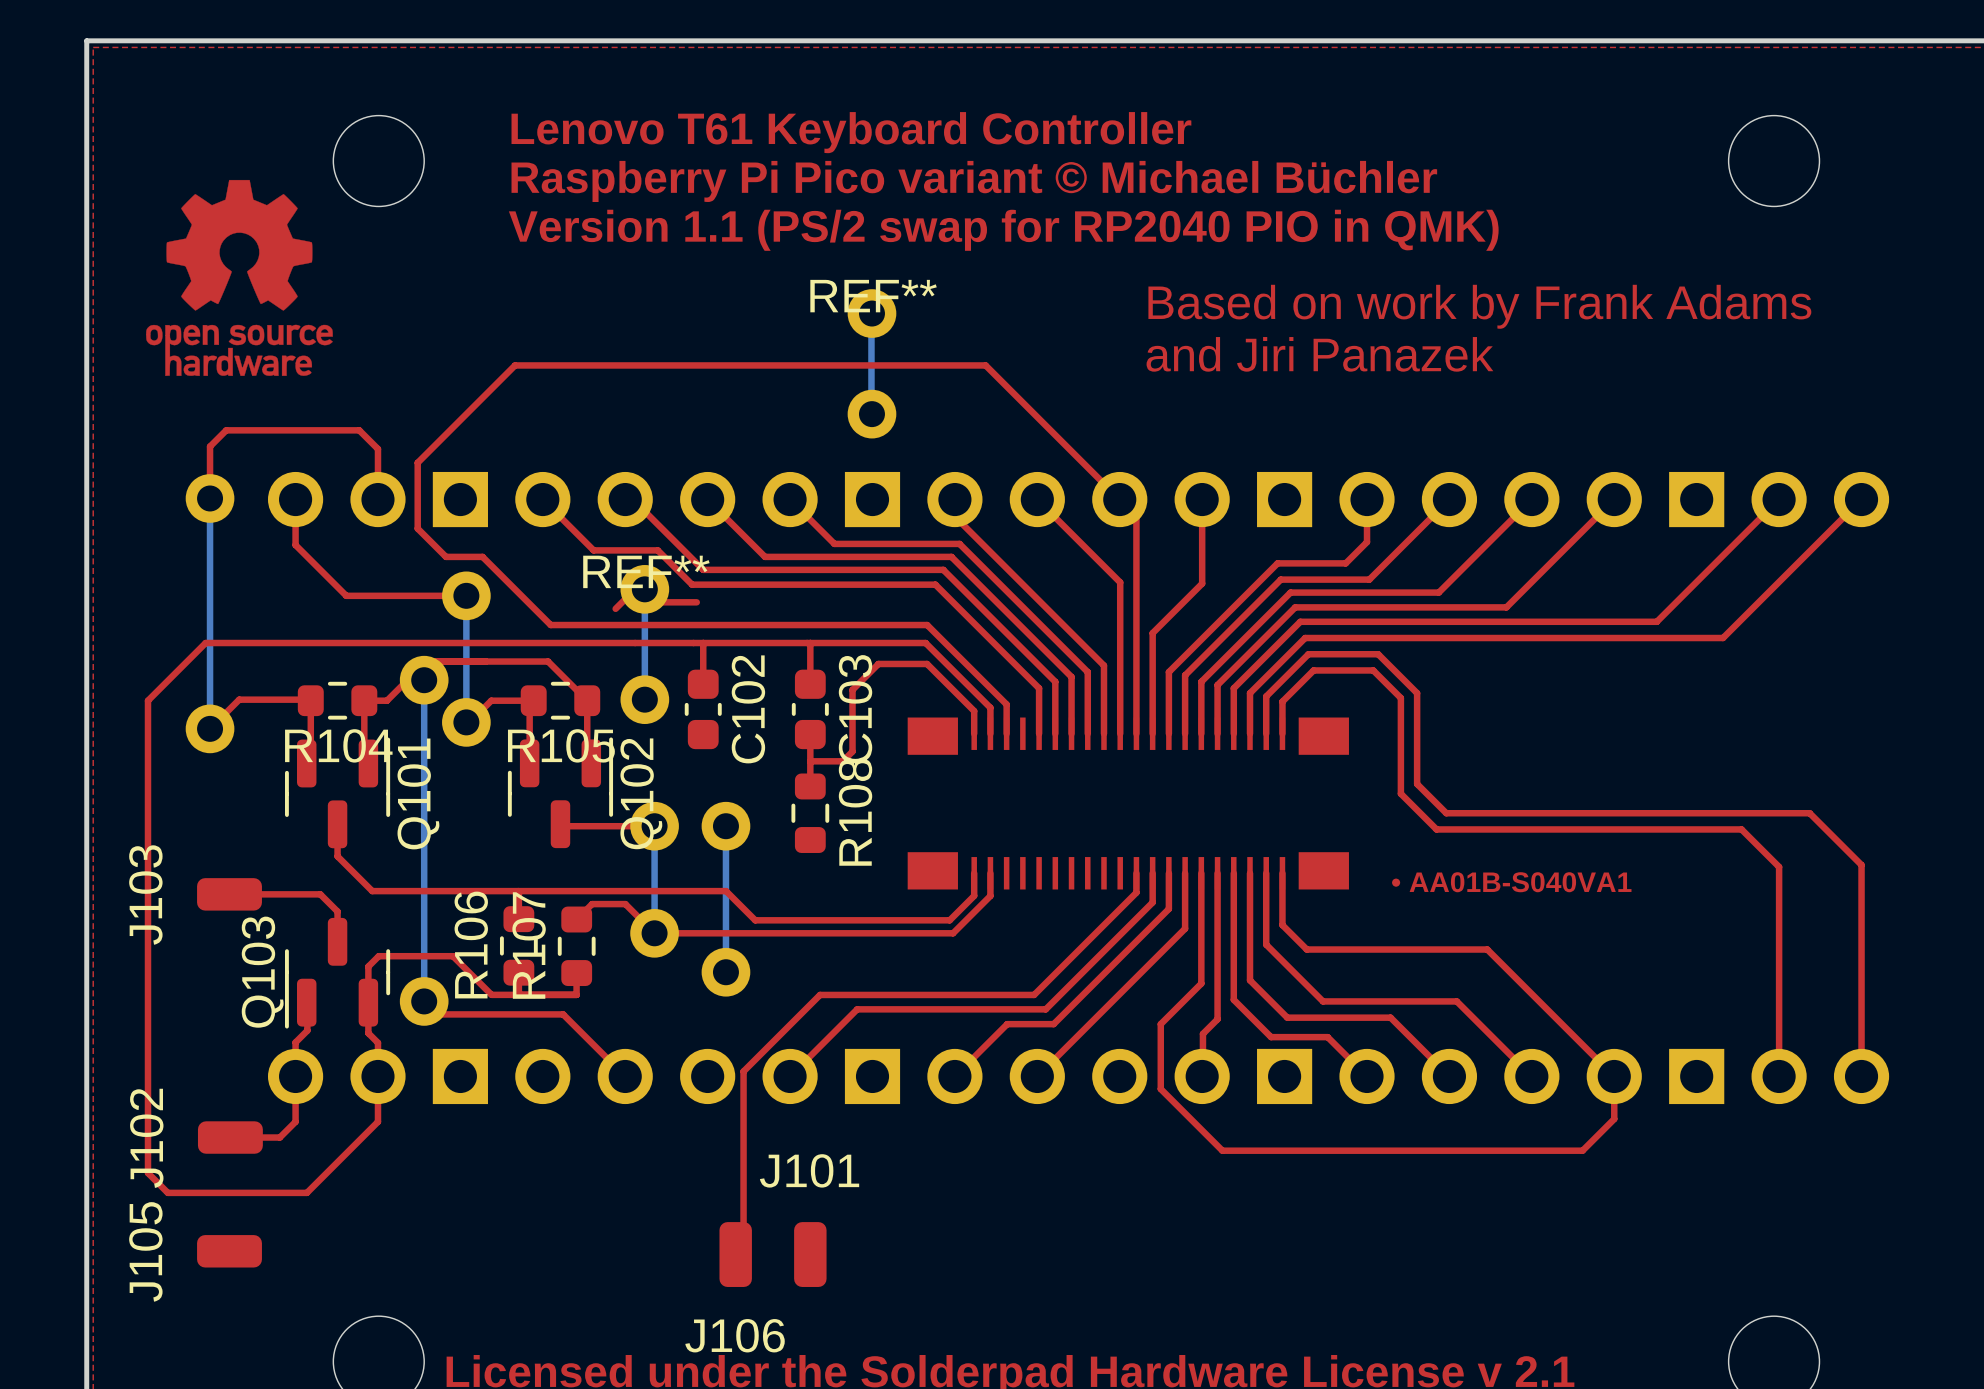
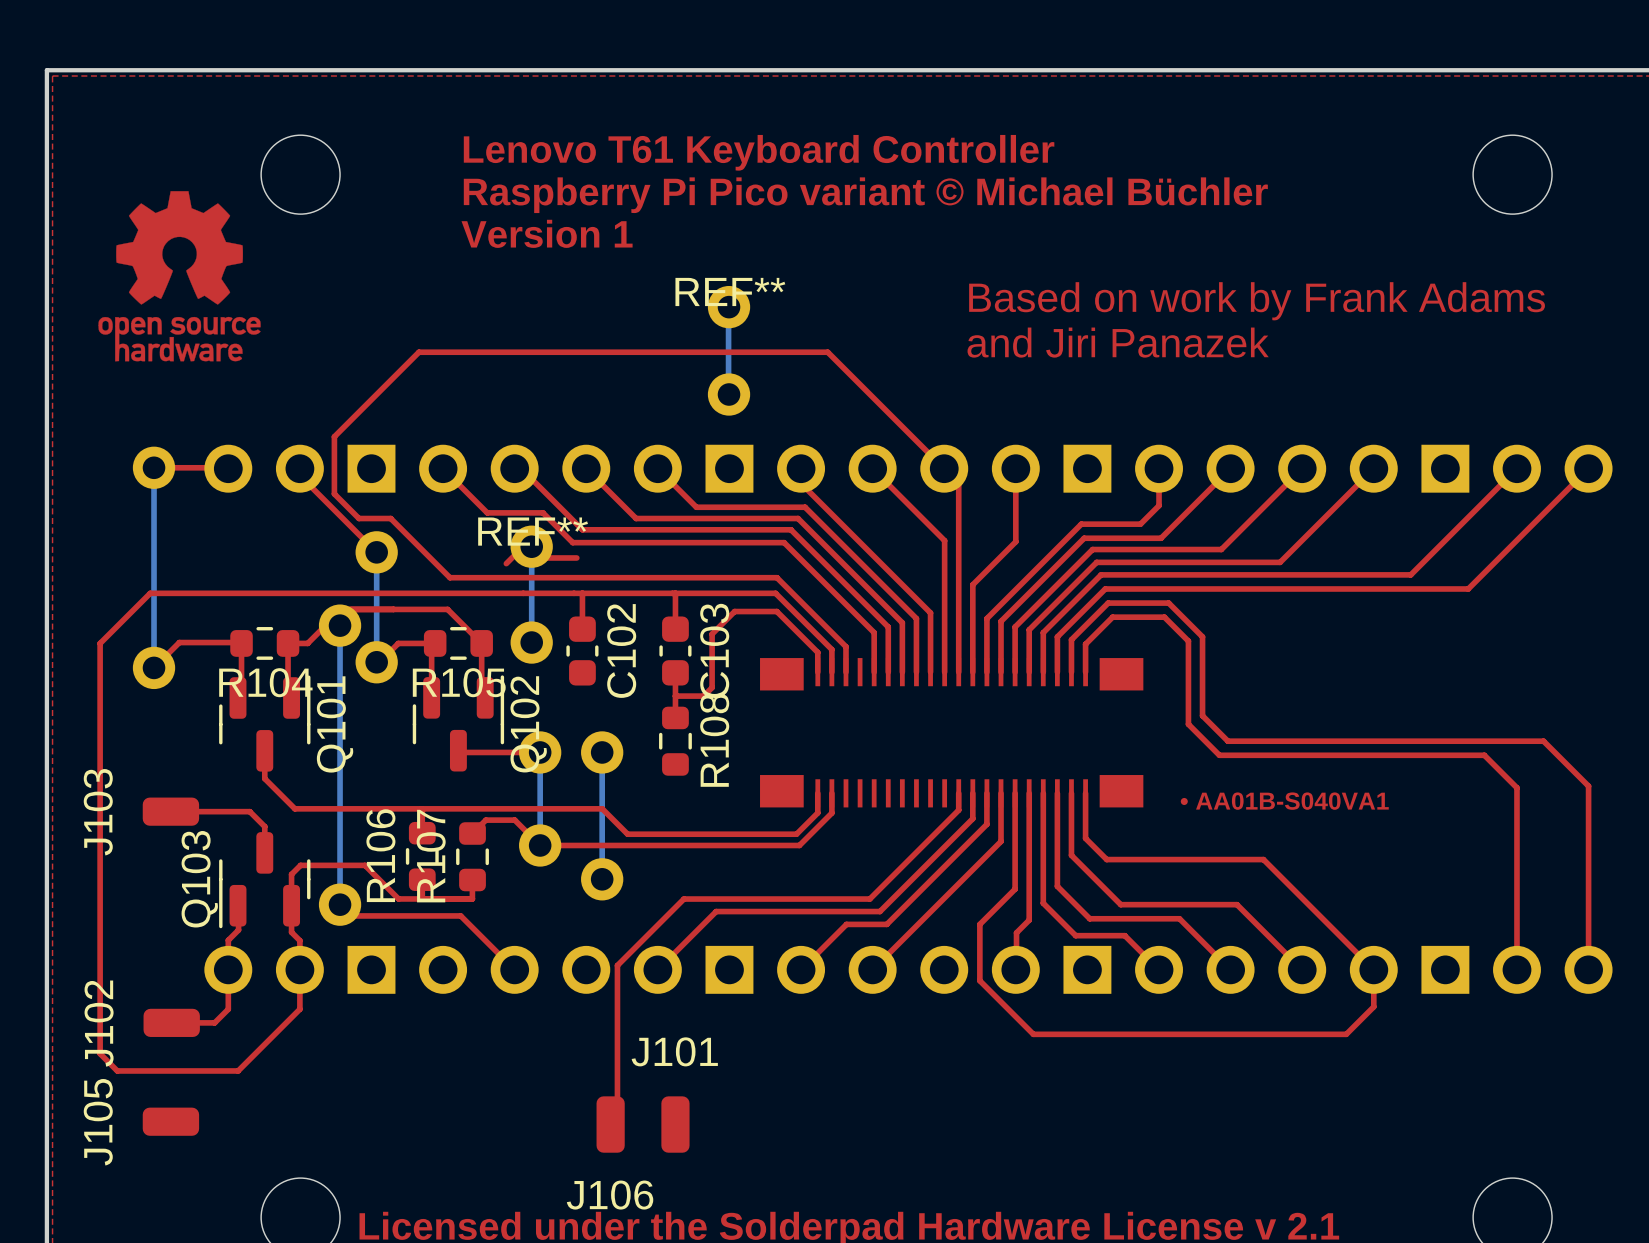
text position: Lenovo T61 Keyboard Controller (851, 132) -> Lenovo T61 Keyboard Controller (759, 152)
text position: Raspberry Pi Pico variant © Michael Büchler (974, 181) -> Raspberry Pi Pico variant © Michael Büchler (865, 195)
text: none -> Version 1 (547, 233)
text: Version 1.1 (PS/2 swap for RP2040 PIO in QMK) (1003, 230) -> none
top track: (210, 498) (210, 446) (226, 430) (359, 430) (377, 449) (377, 499) -> (154, 467) (213, 467)
top track: (295, 499) (295, 545) (346, 595) (466, 595) -> (299, 475) (376, 552)

